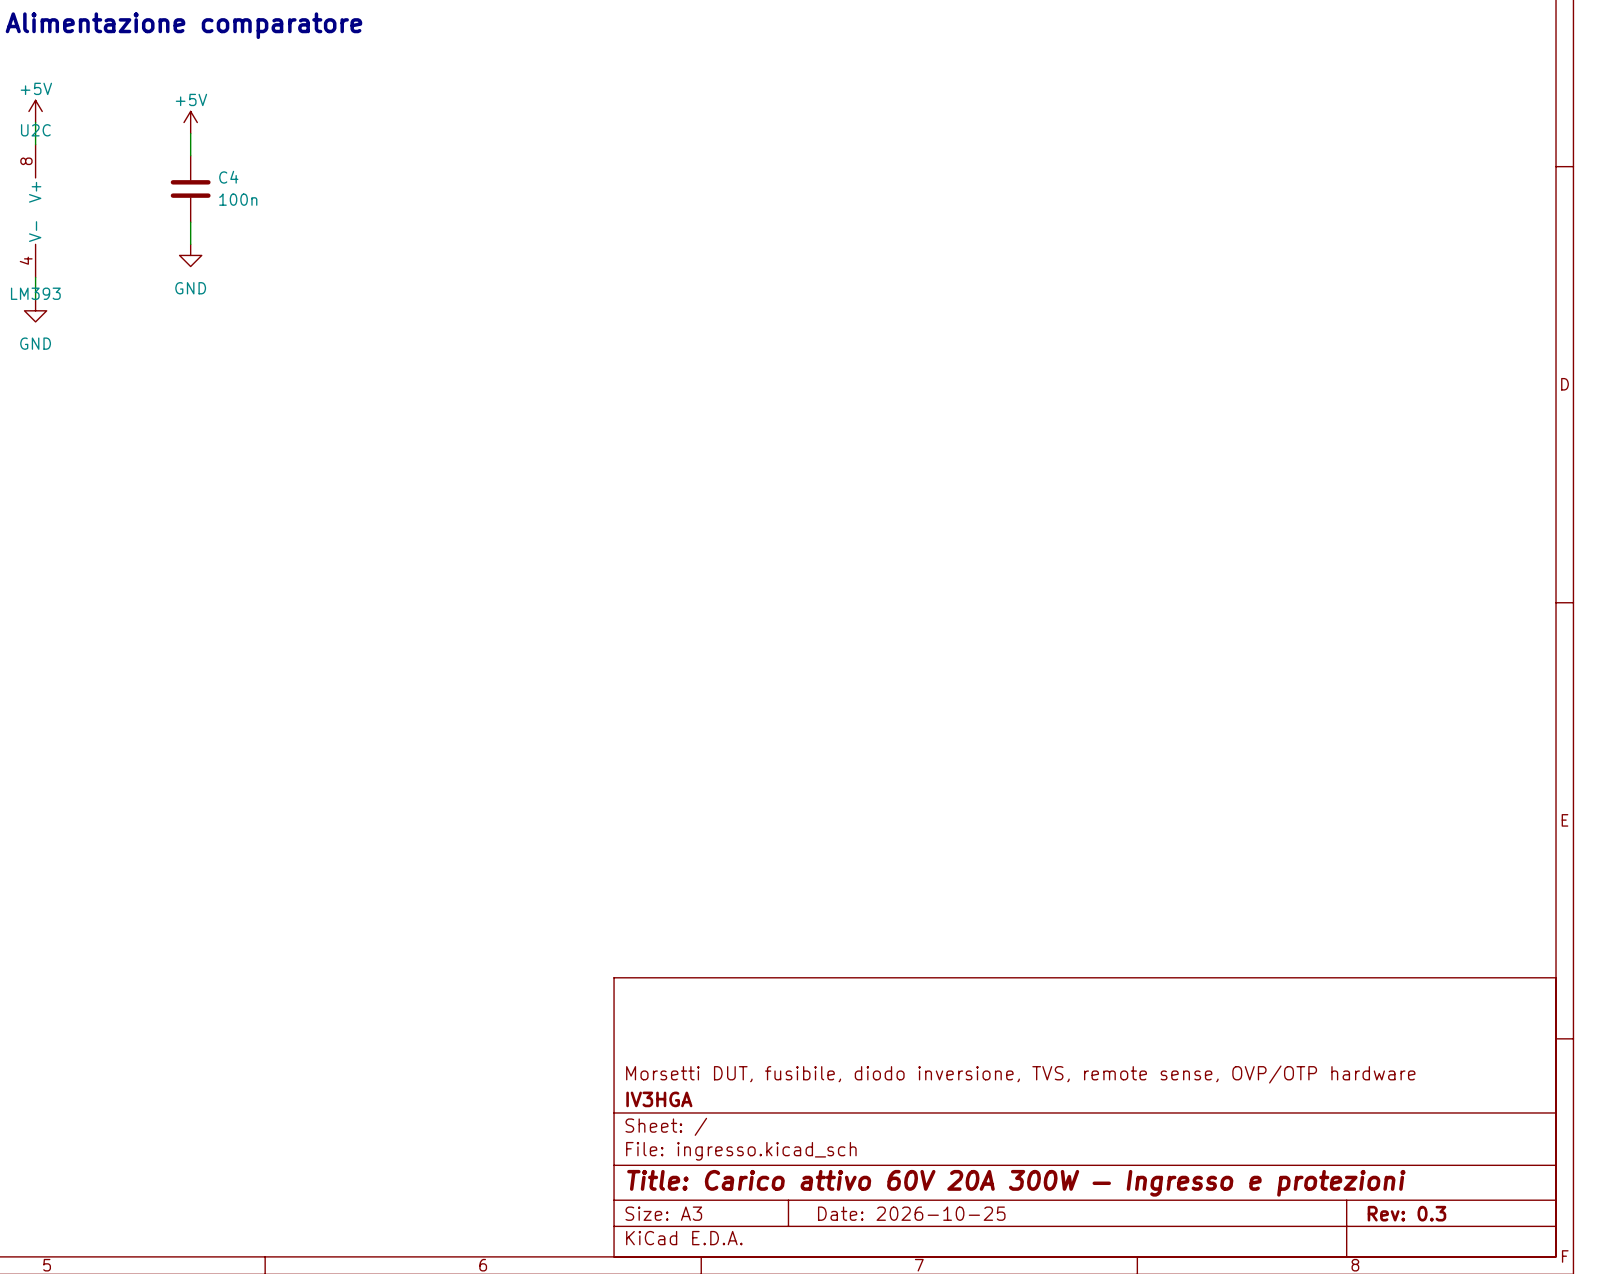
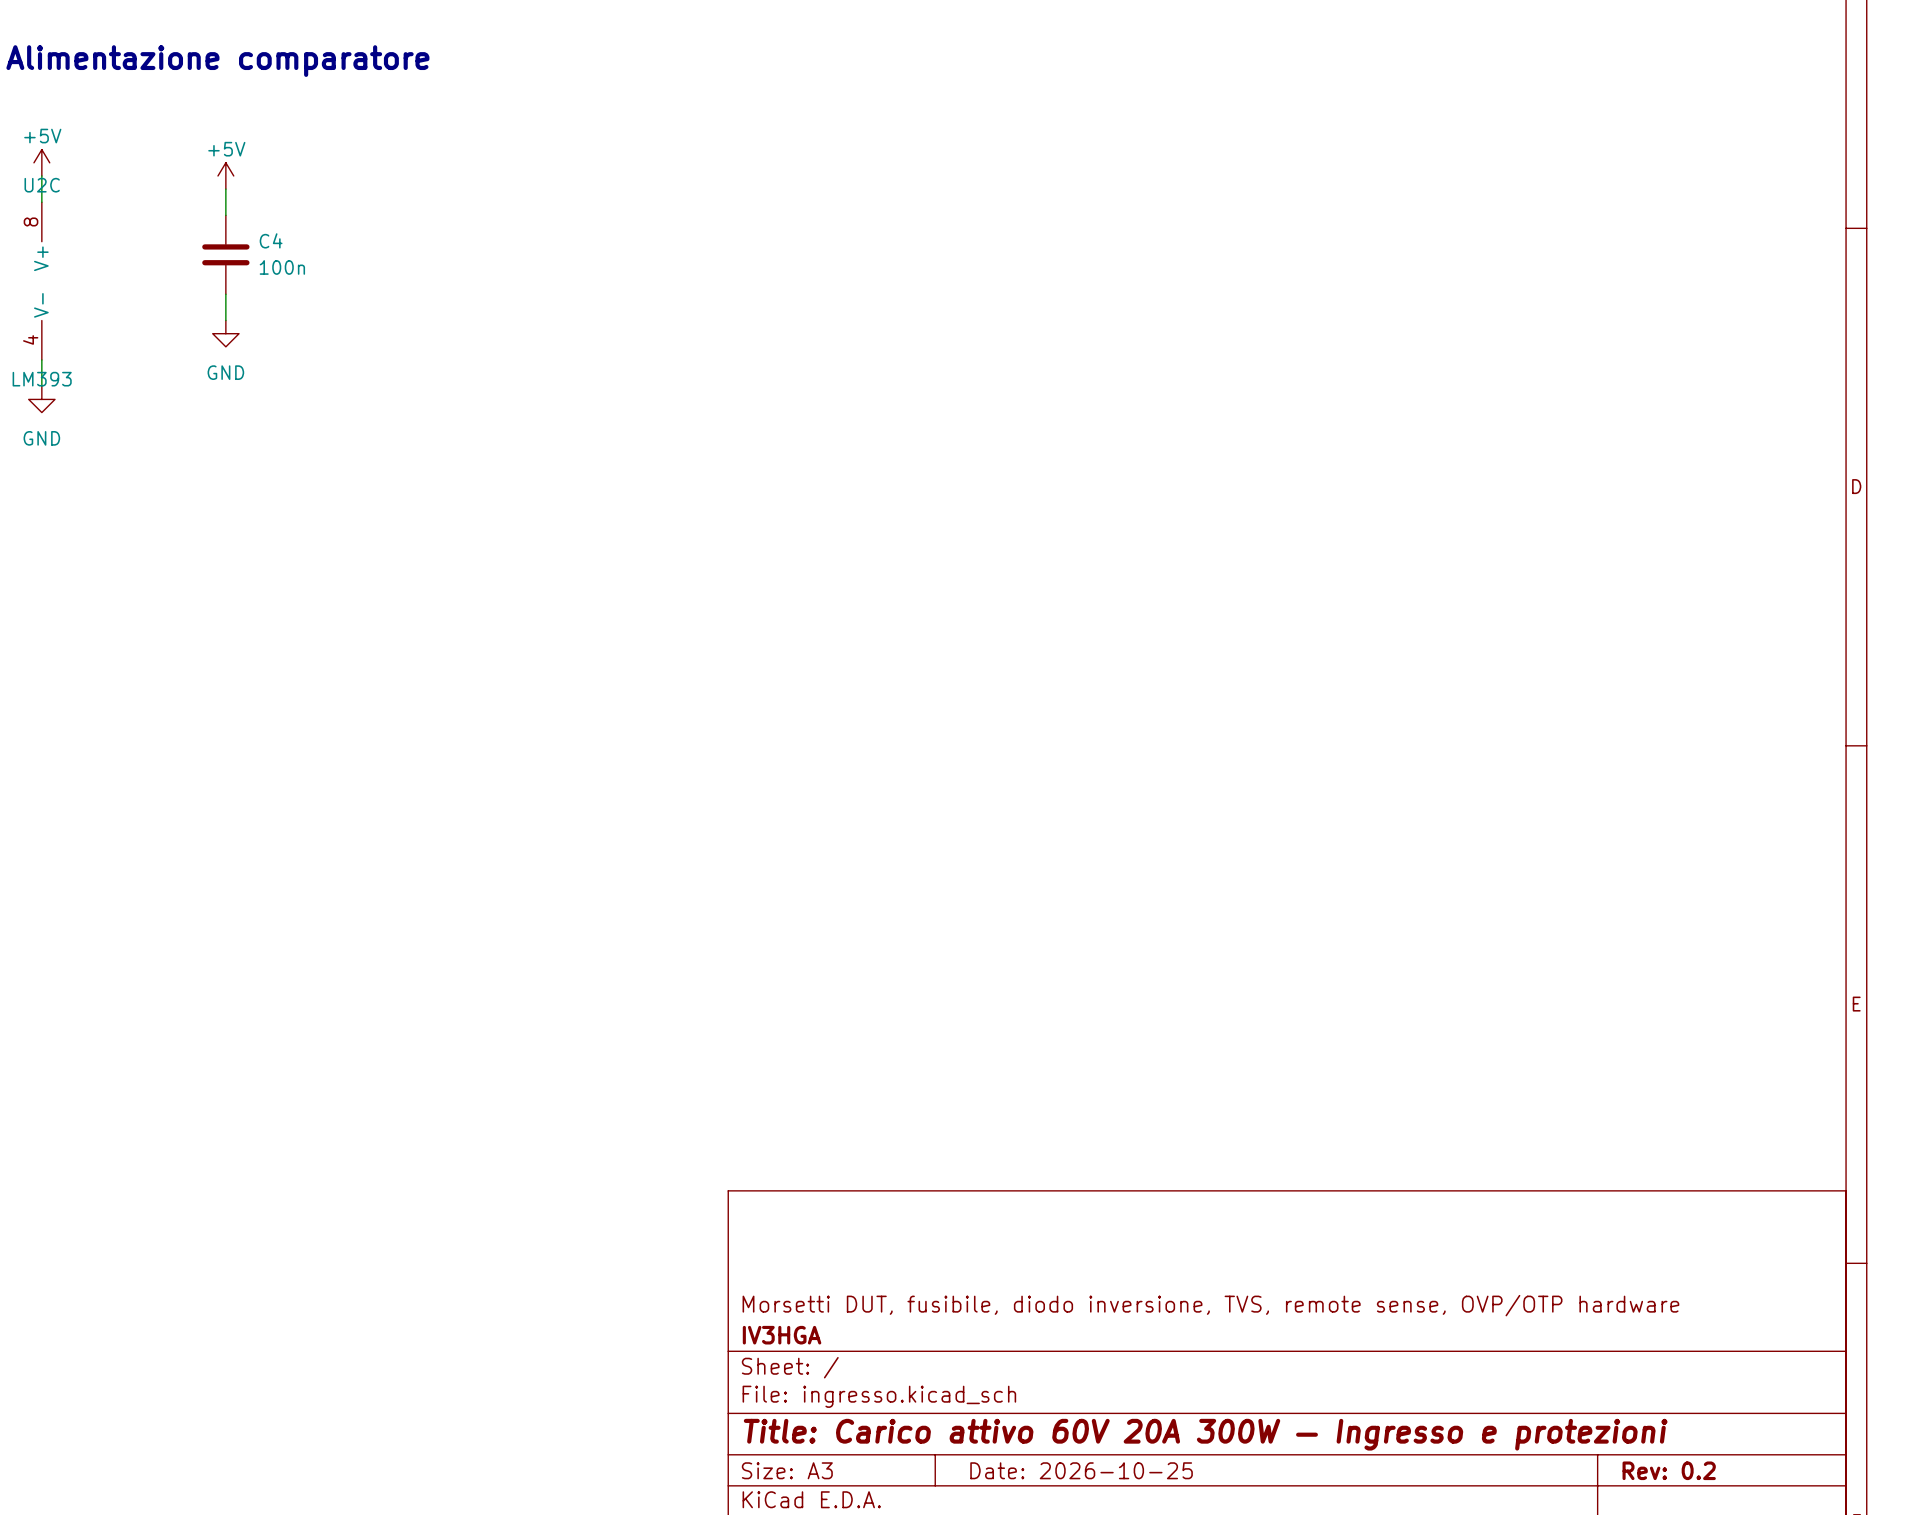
title block: Rev: 0.3 (1406, 1213) -> Rev: 0.2 (1669, 1470)

